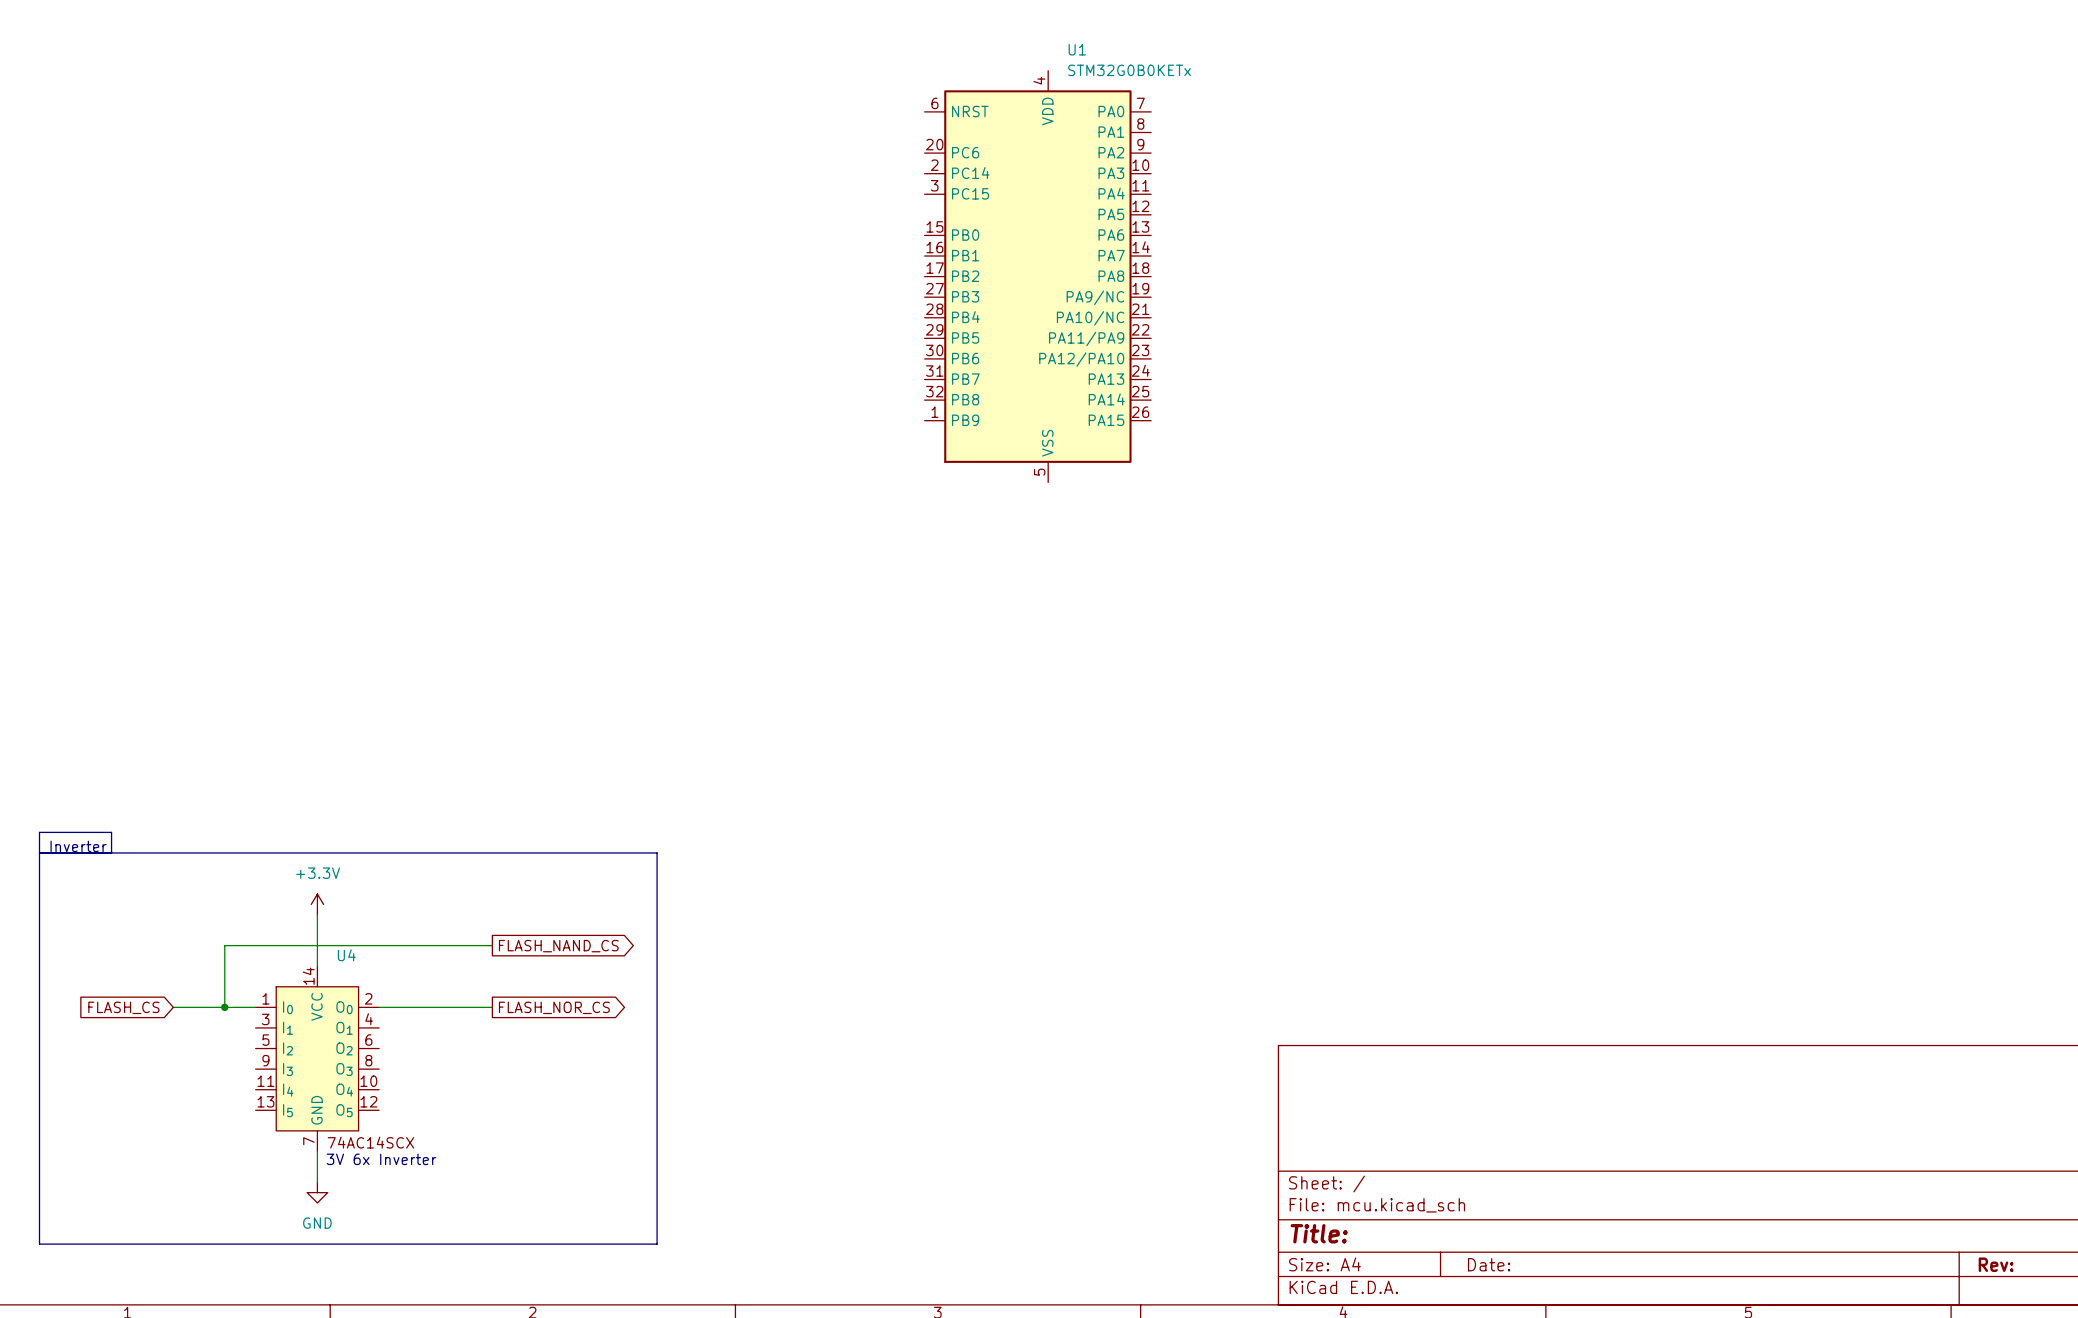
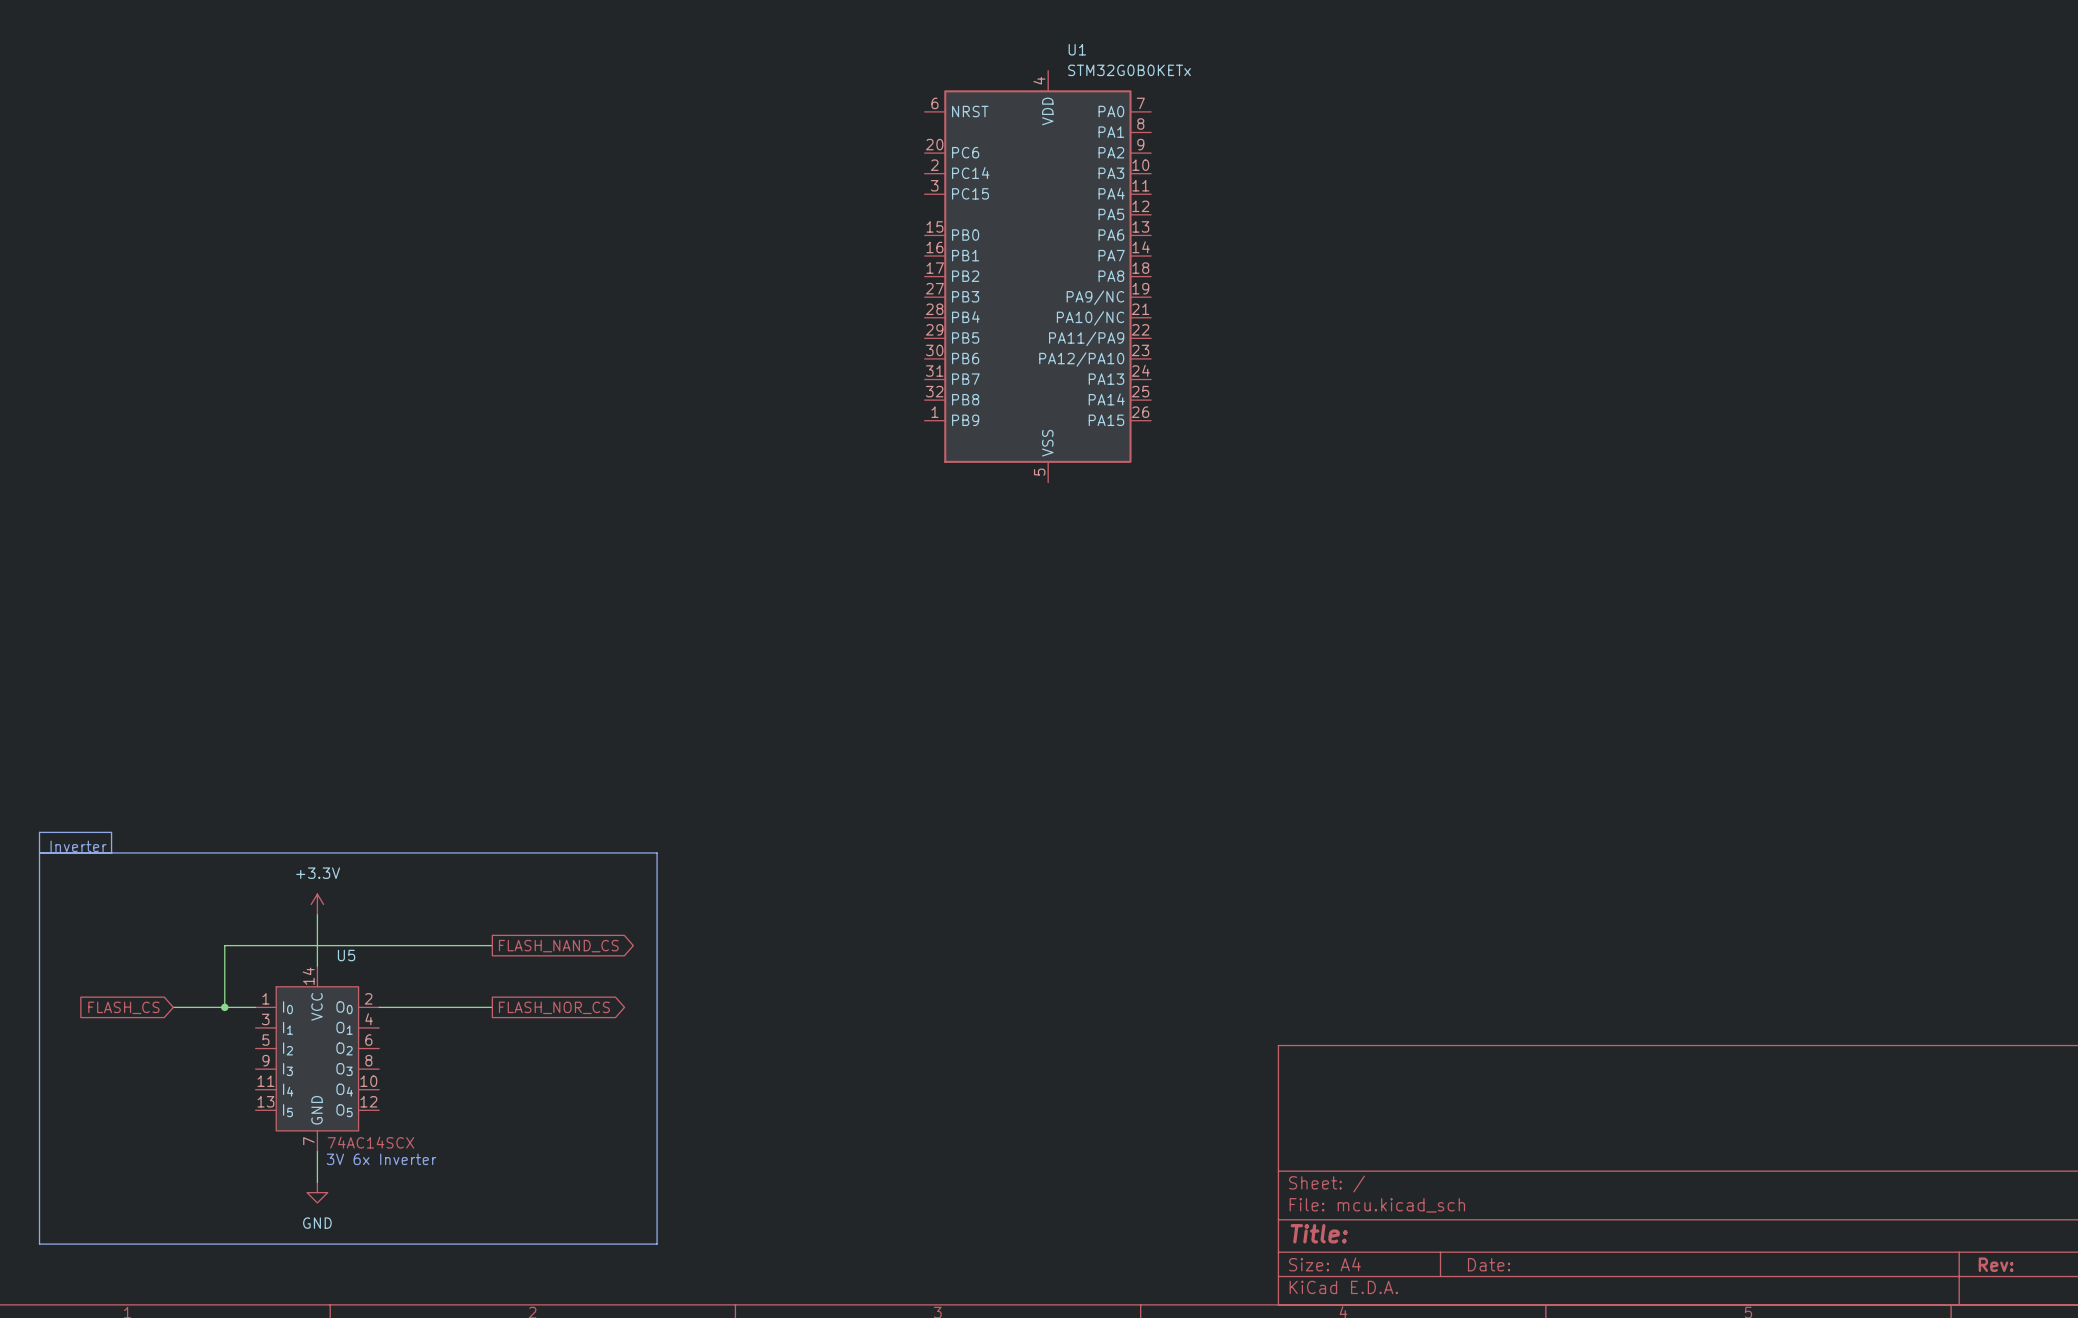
U4 name: U4 (346, 955) -> U5 (346, 955)

